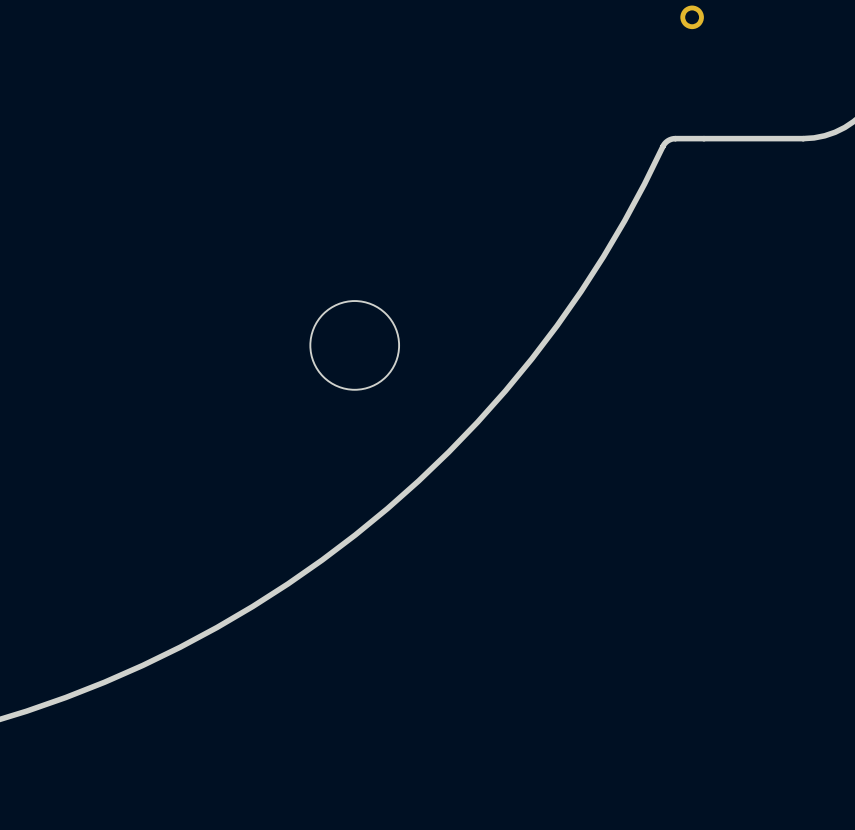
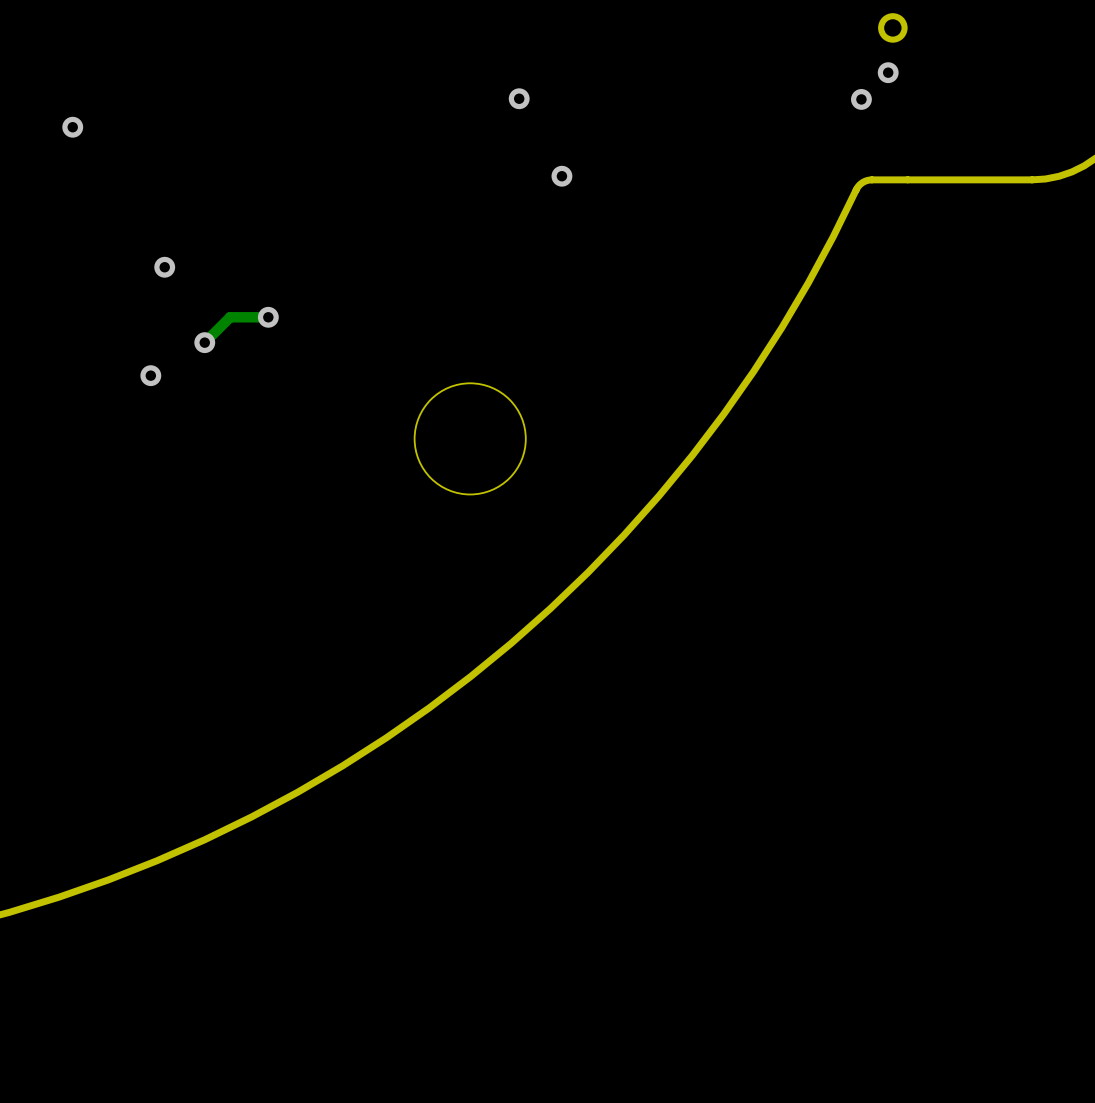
via: none -> (888, 72)
via: none -> (519, 98)
via: none -> (861, 99)
via: none -> (72, 127)
via: none -> (561, 176)
via: none -> (164, 267)
track: none -> (268, 317) (230, 317) (204, 342)
via: none -> (268, 317)
via: none -> (204, 342)
via: none -> (150, 375)

